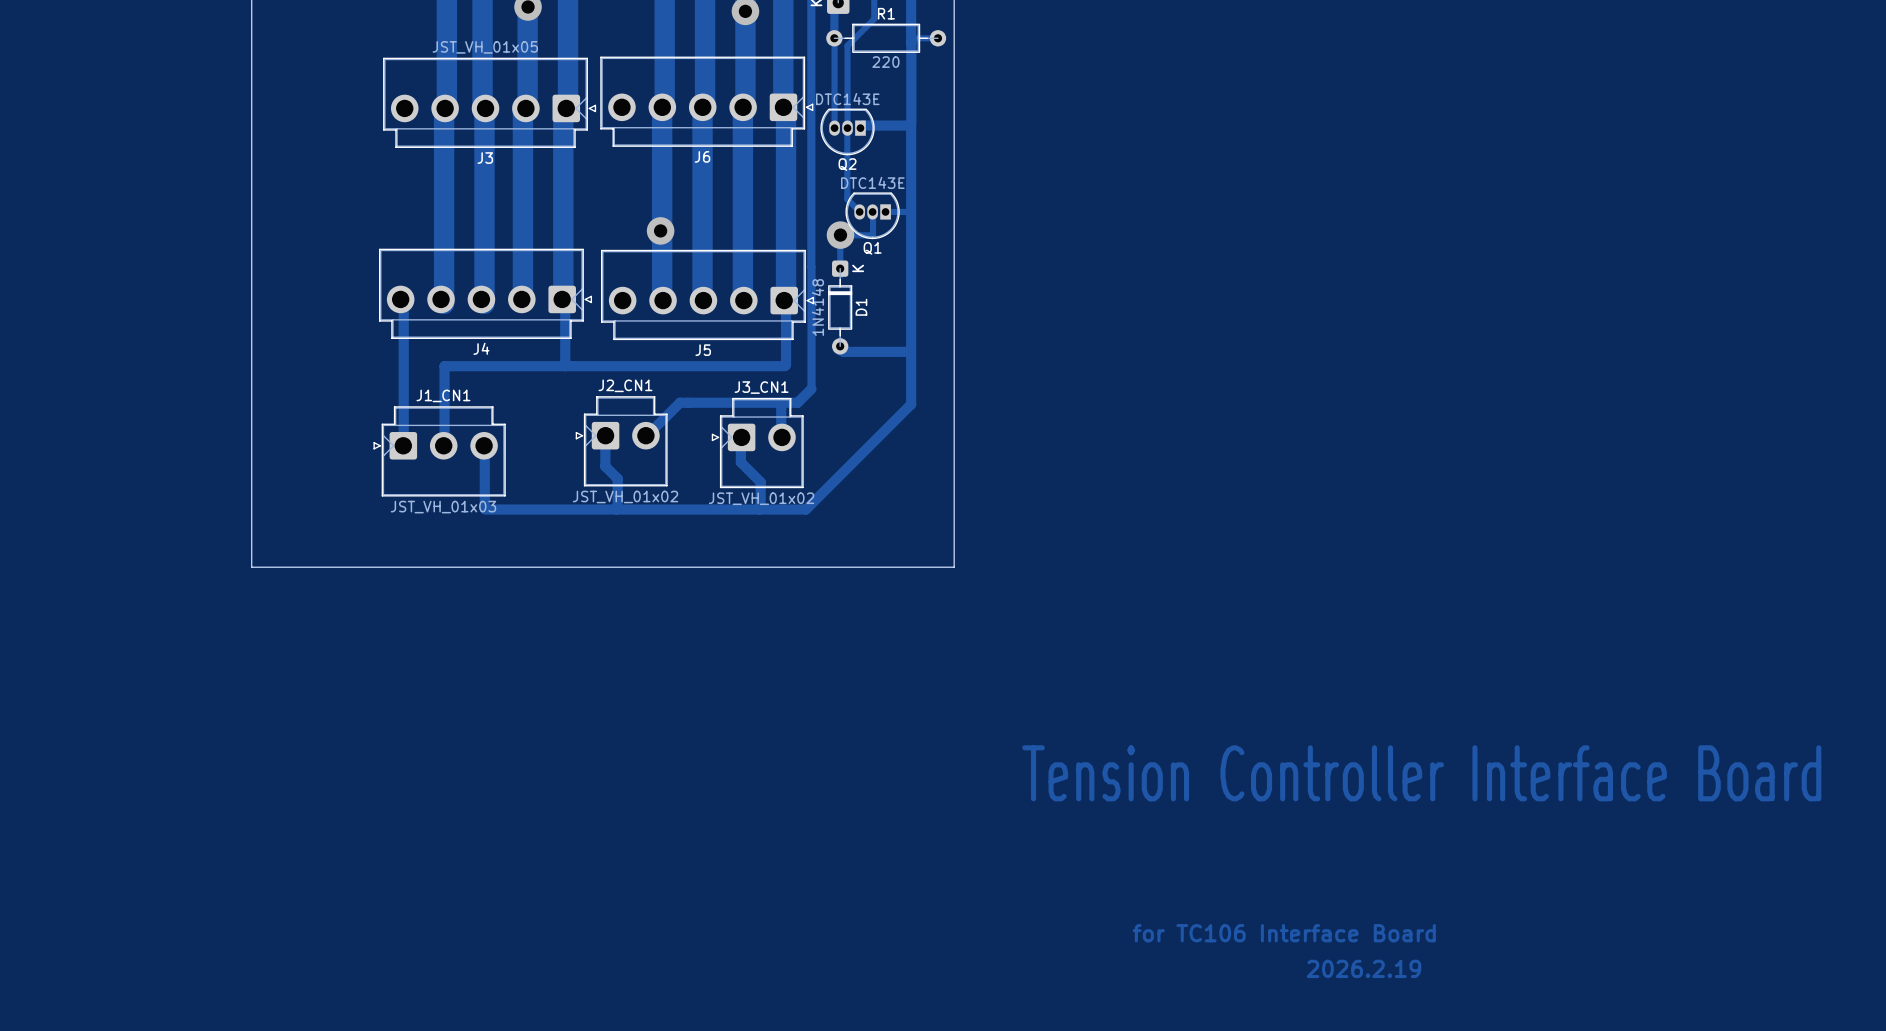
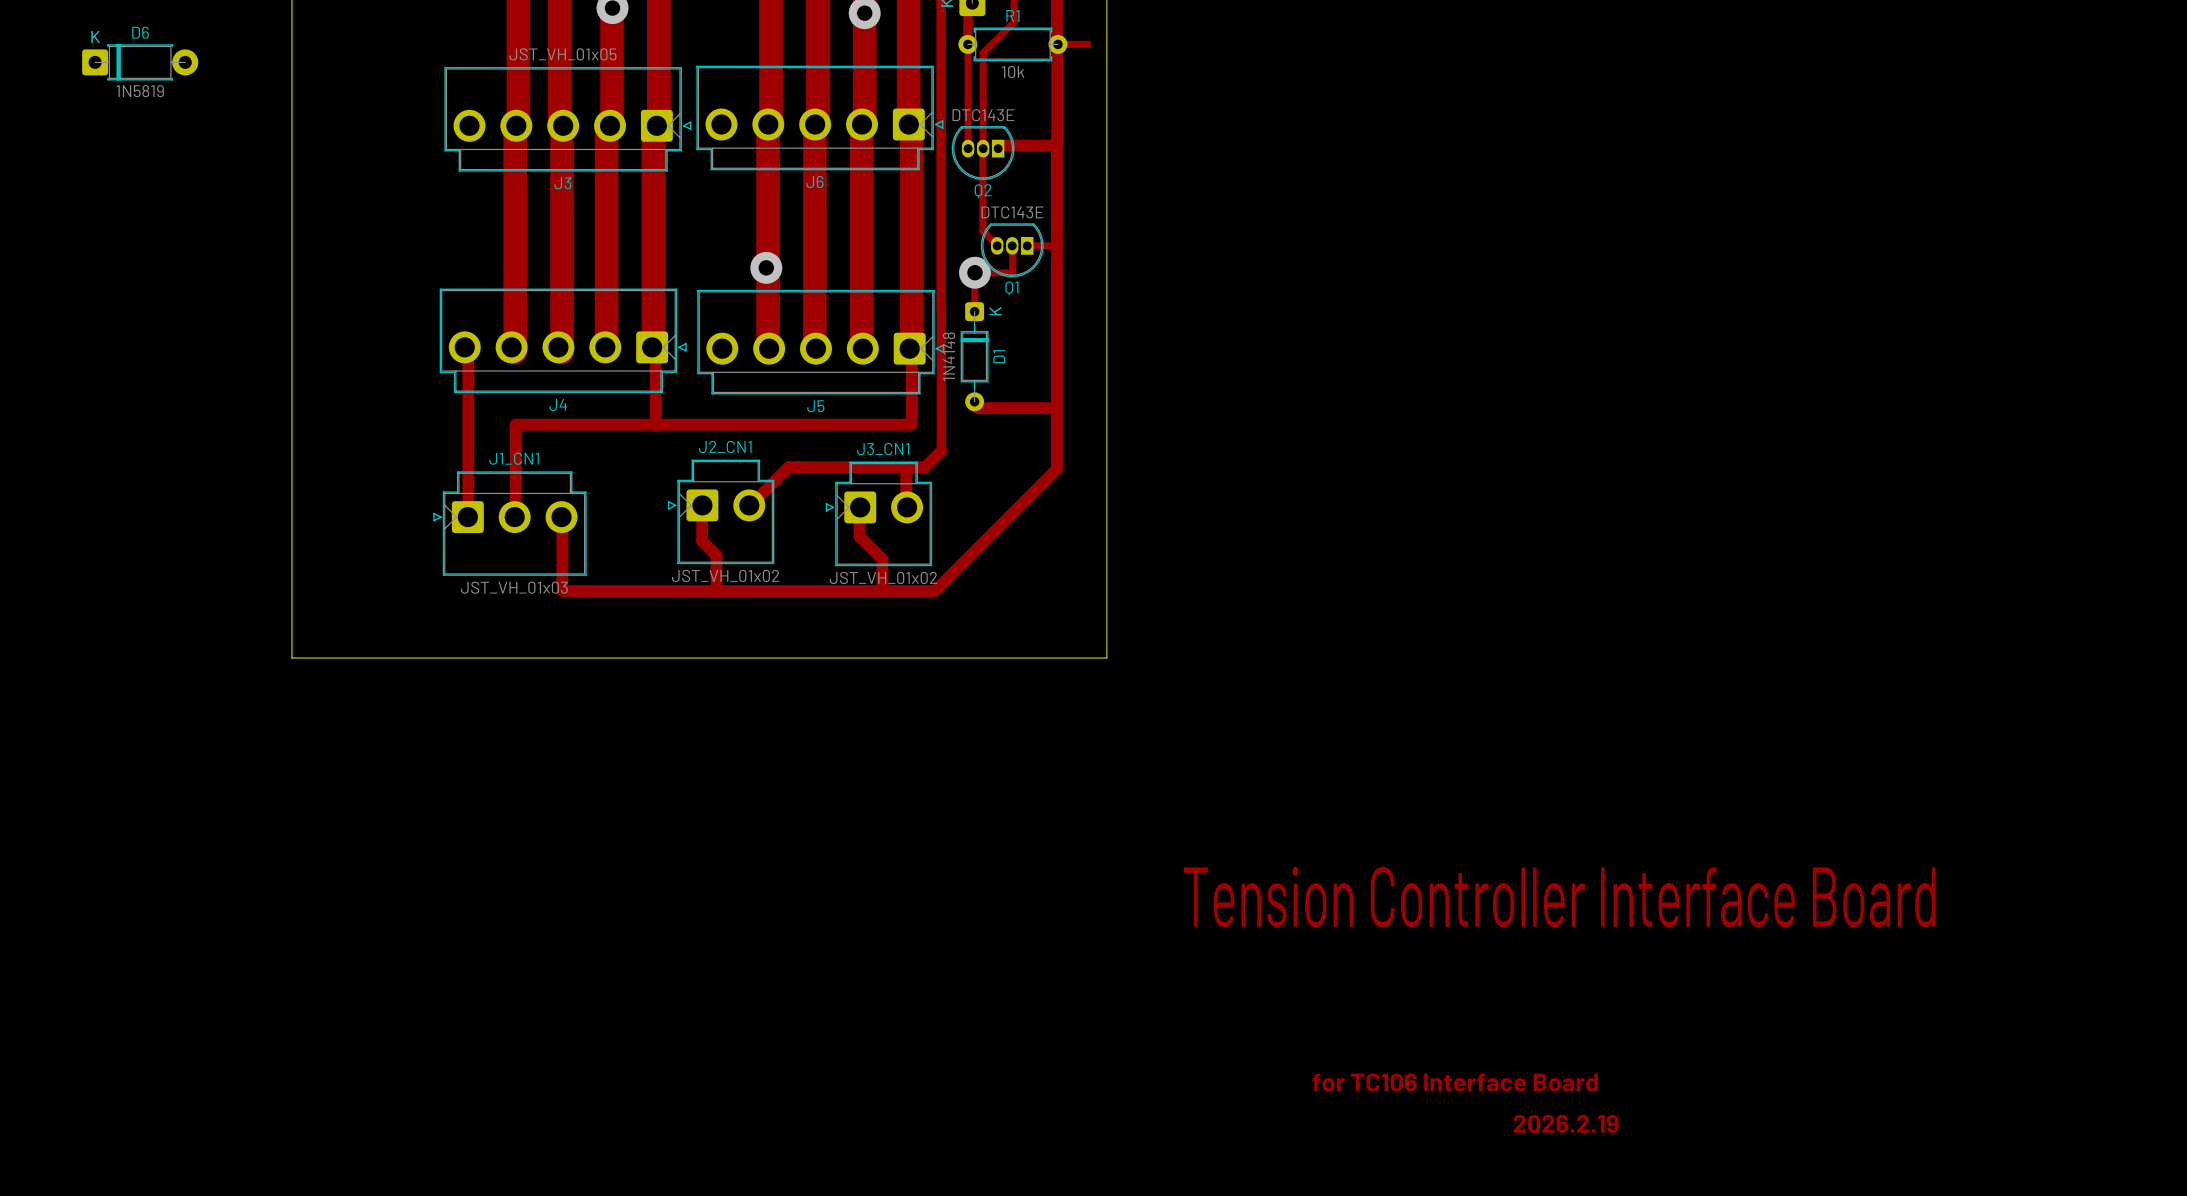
R1 footprint: [826, 23, 947, 53] -> [958, 27, 1068, 62]
D6: none -> 1N5819 (140, 62)
R1 value: 220 (885, 62) -> 10k (1013, 72)

